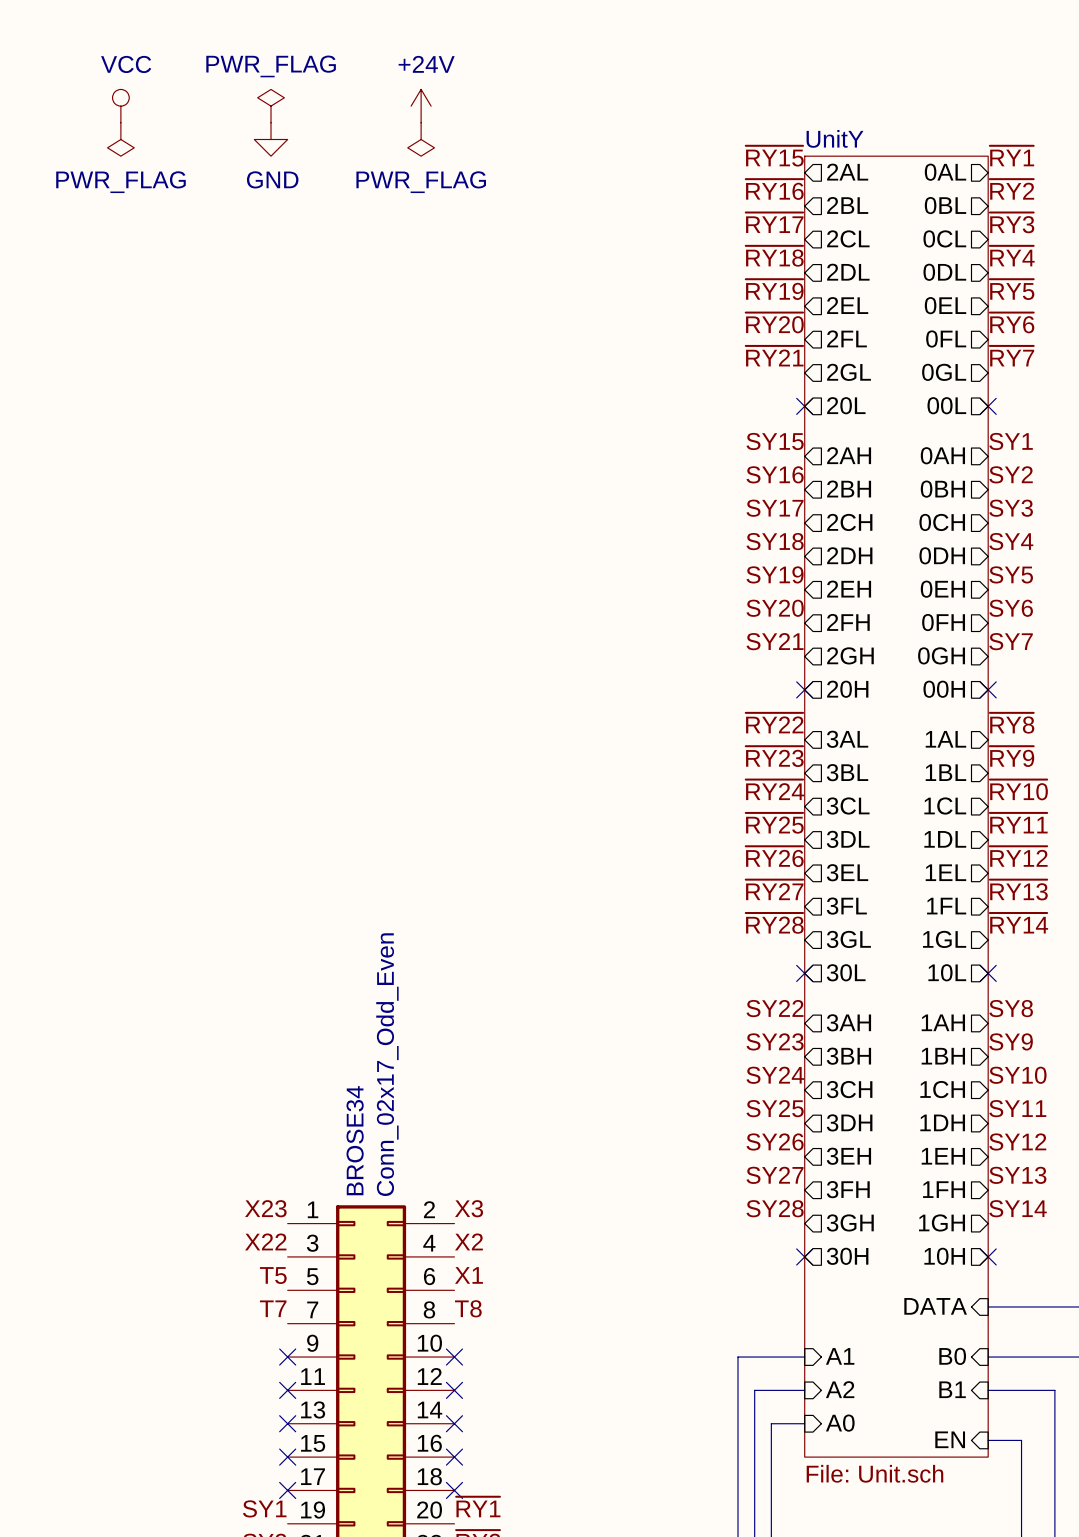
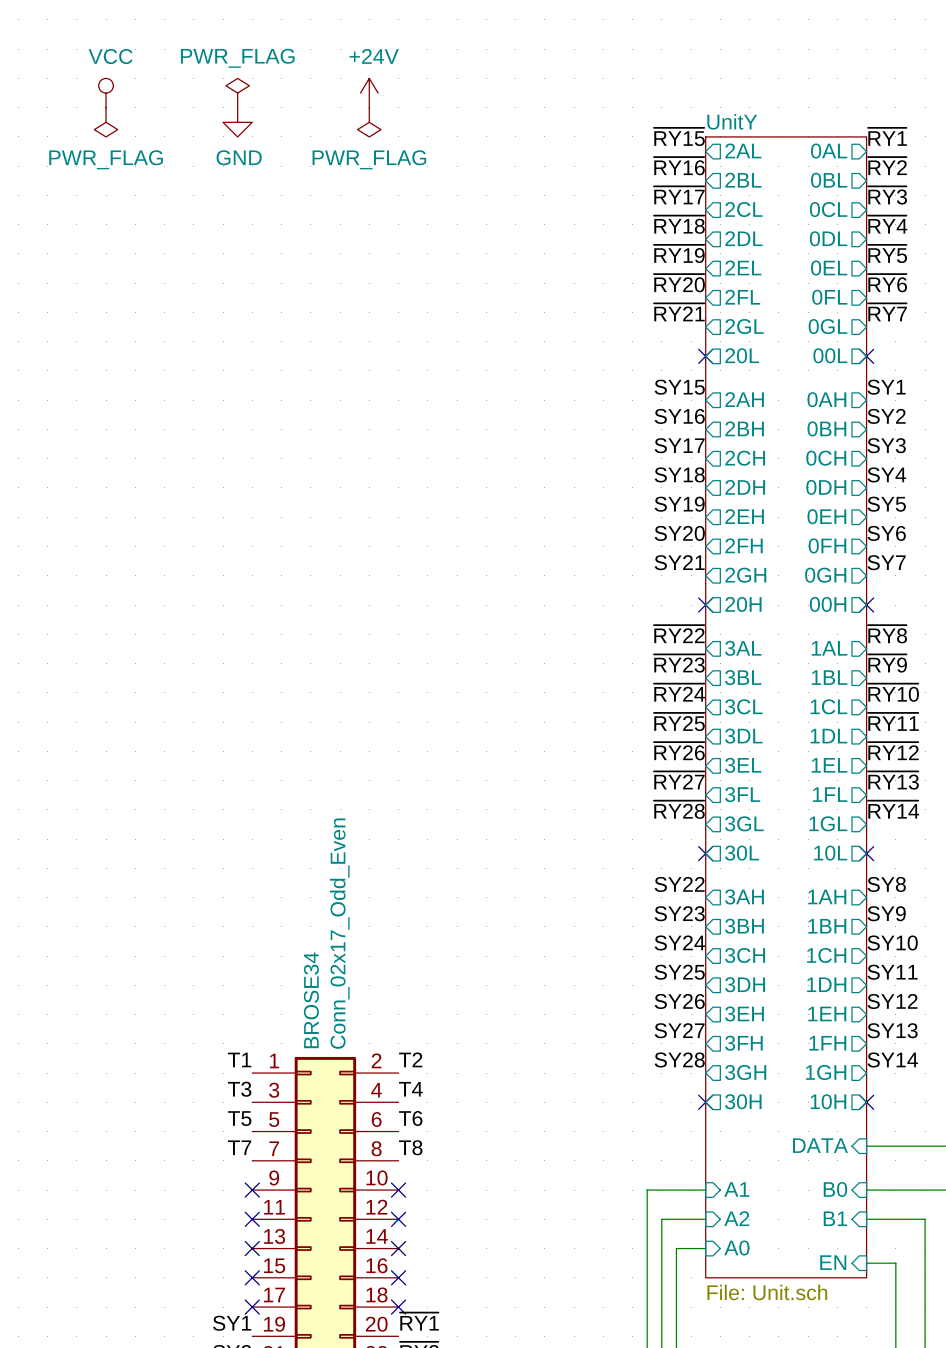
label: X23 (265, 1208) -> T1 (239, 1059)
label: X3 (469, 1208) -> T2 (410, 1059)
label: X22 (265, 1241) -> T3 (239, 1089)
label: X2 (468, 1241) -> T4 (410, 1089)
label: X1 (468, 1275) -> T6 (410, 1118)

